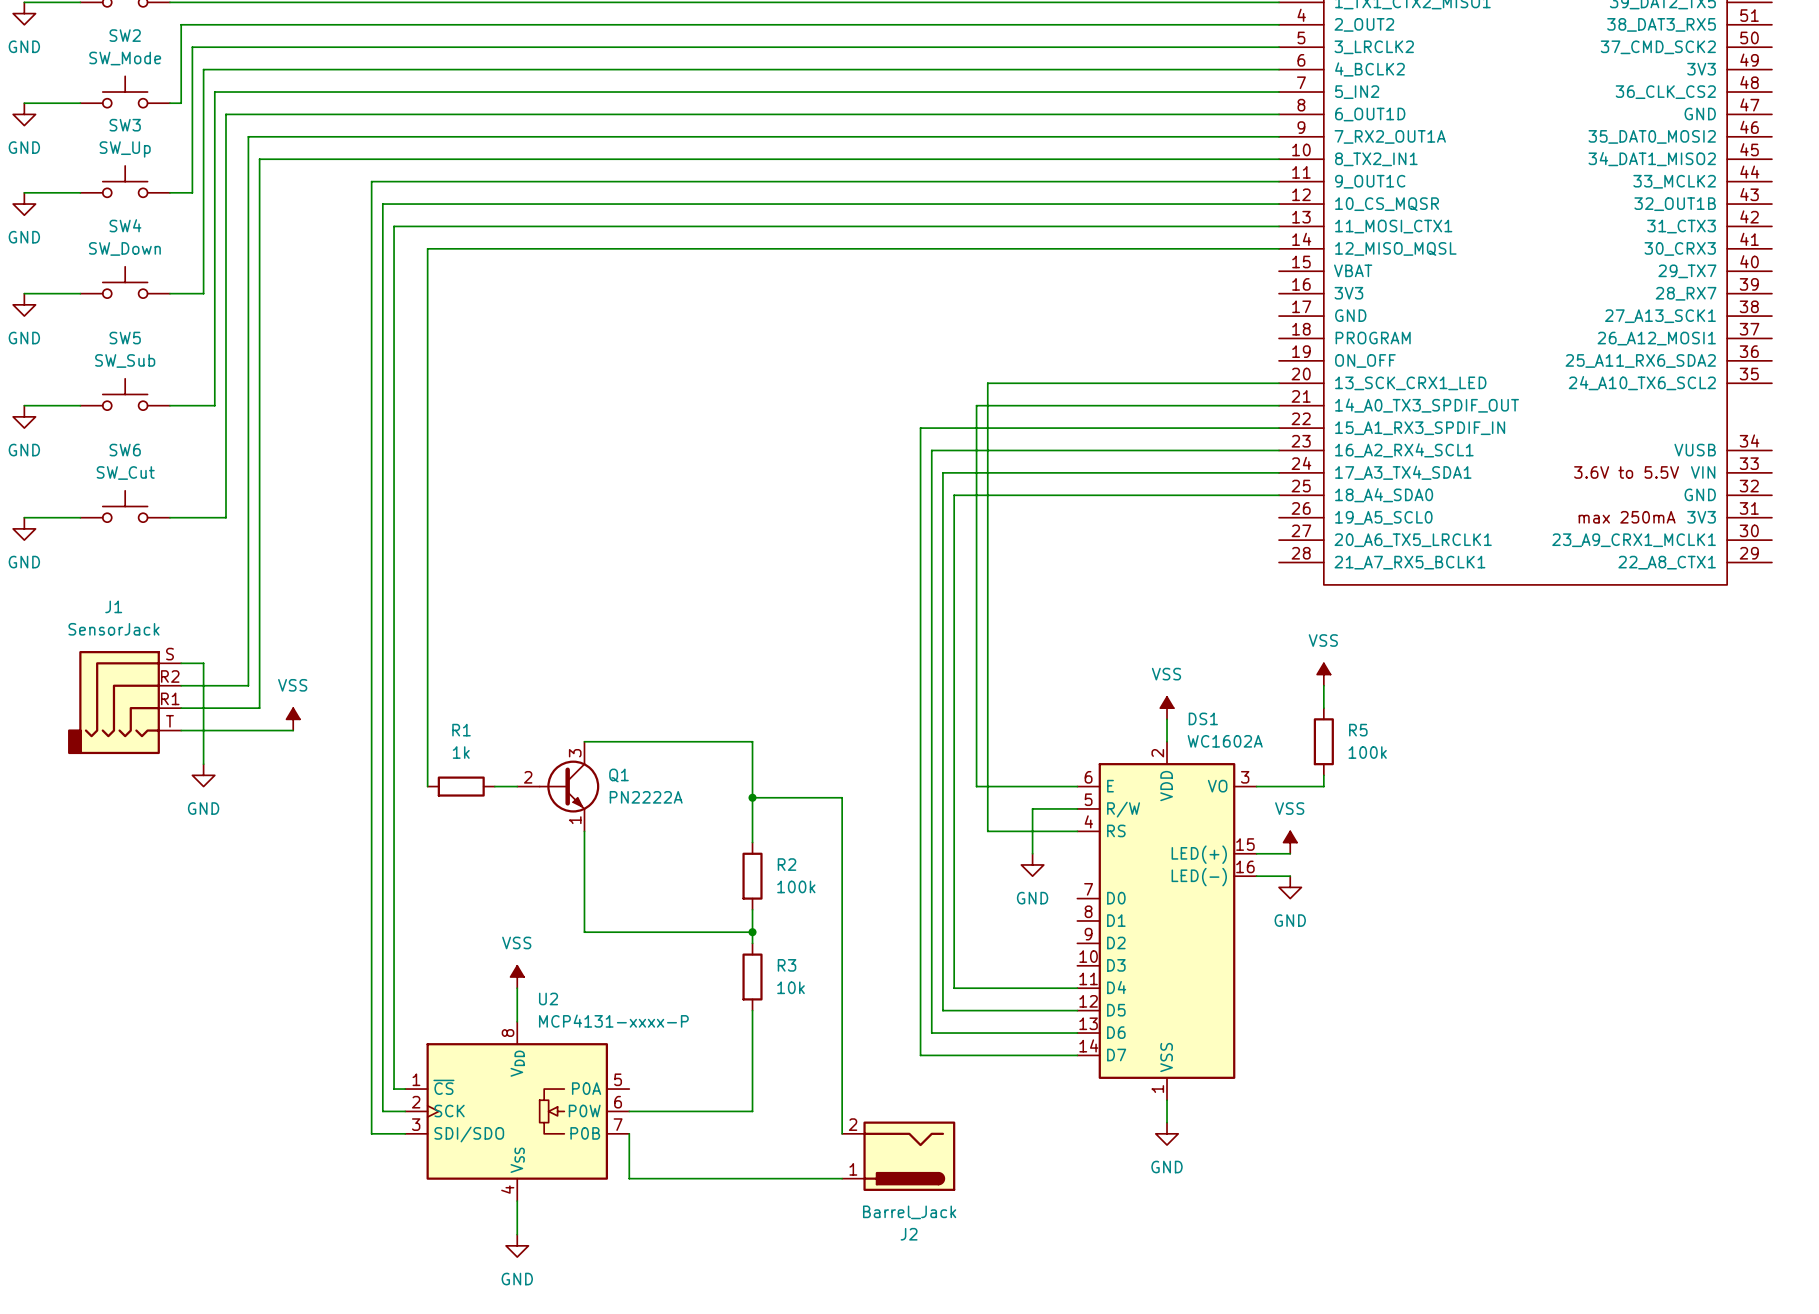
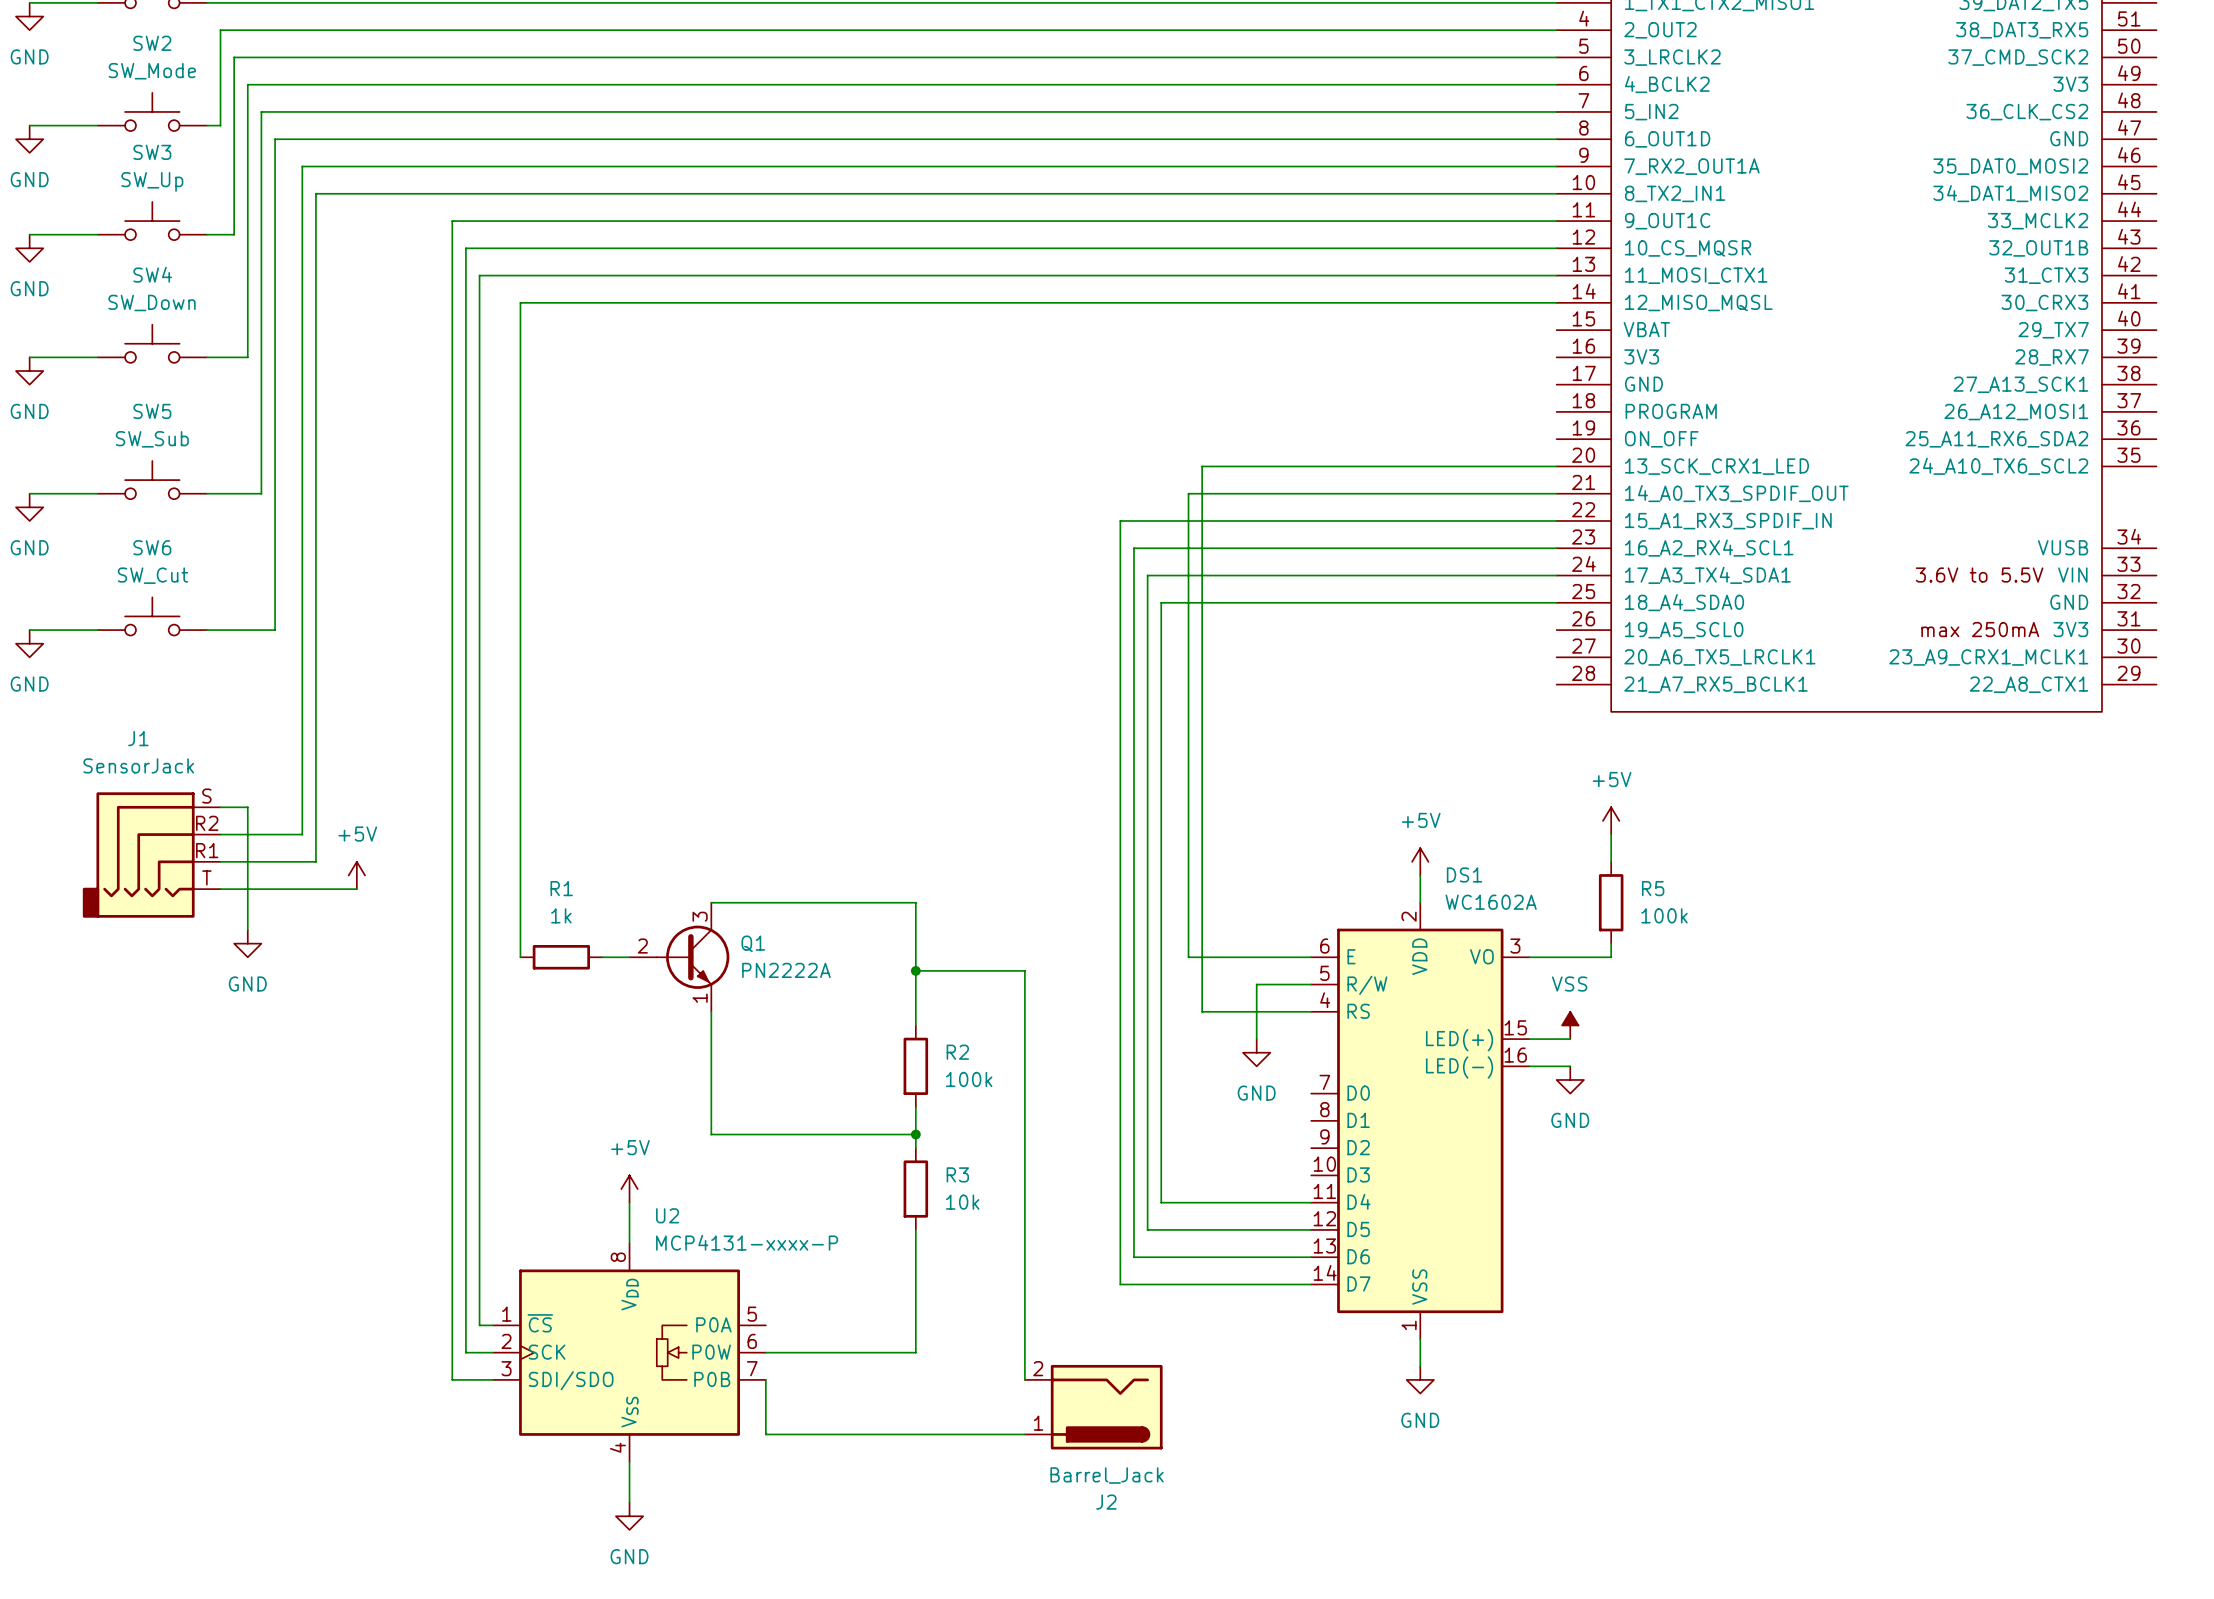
power symbol: VSS (1323, 674) -> +5V (1611, 820)
power symbol: VSS (1167, 708) -> +5V (1420, 861)
power symbol: VSS (293, 719) -> +5V (356, 875)
power symbol: VSS (517, 977) -> +5V (629, 1189)

